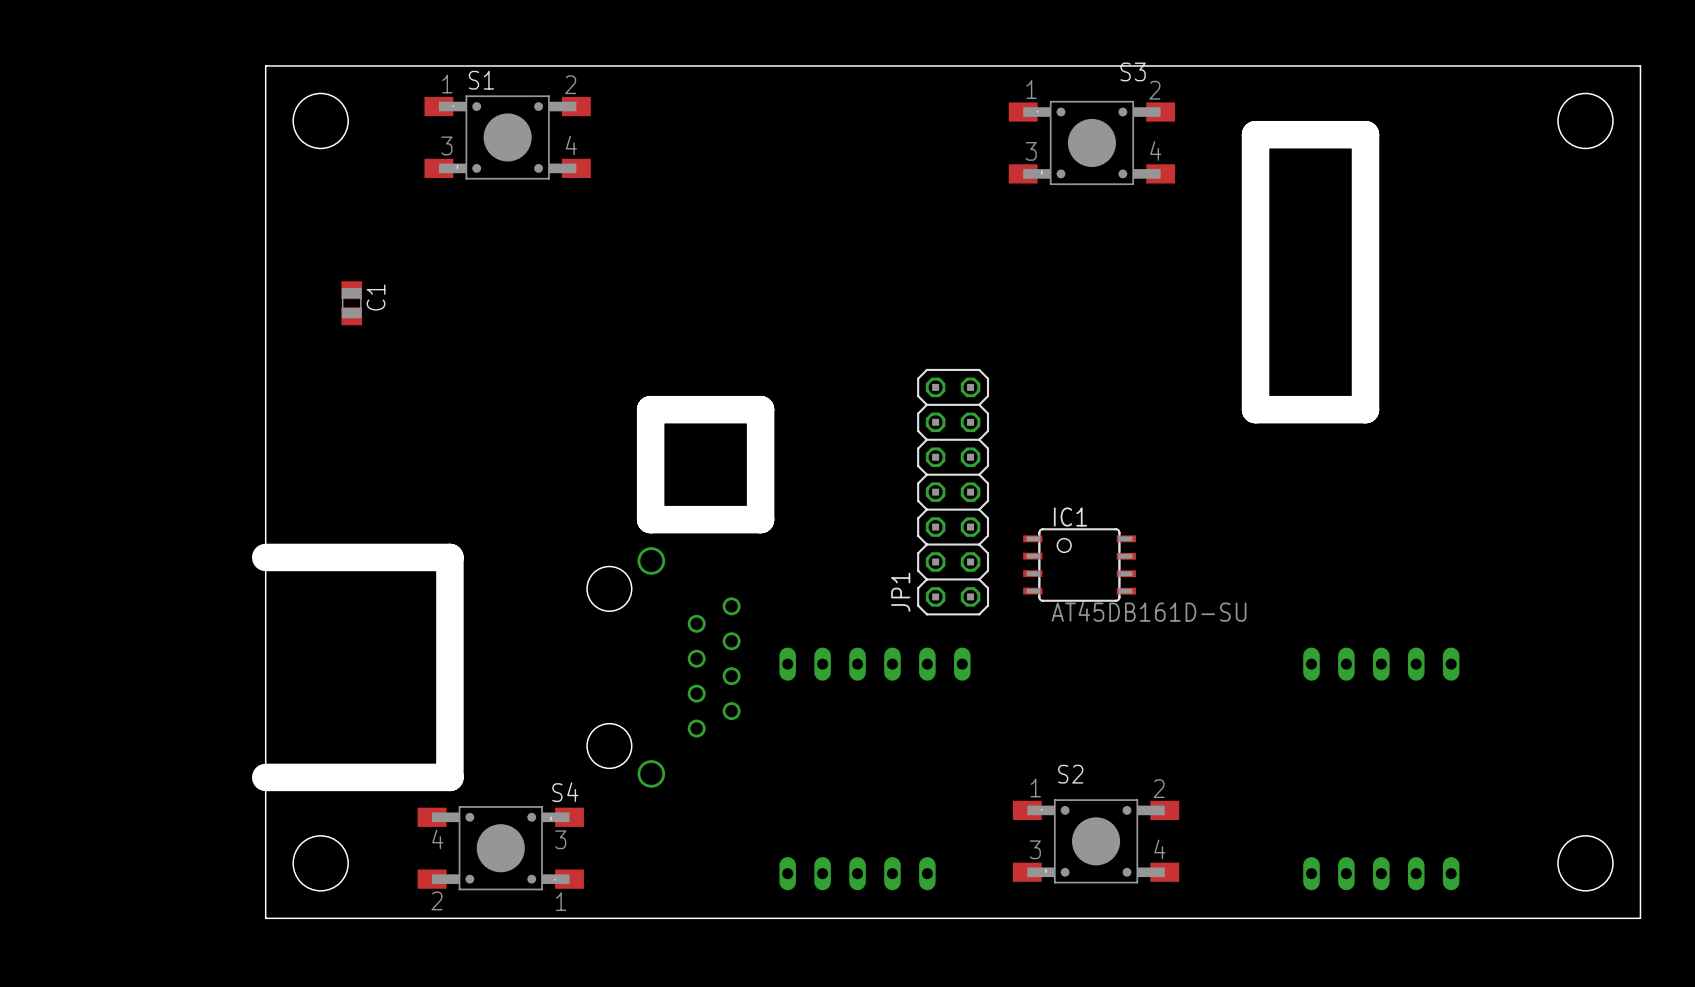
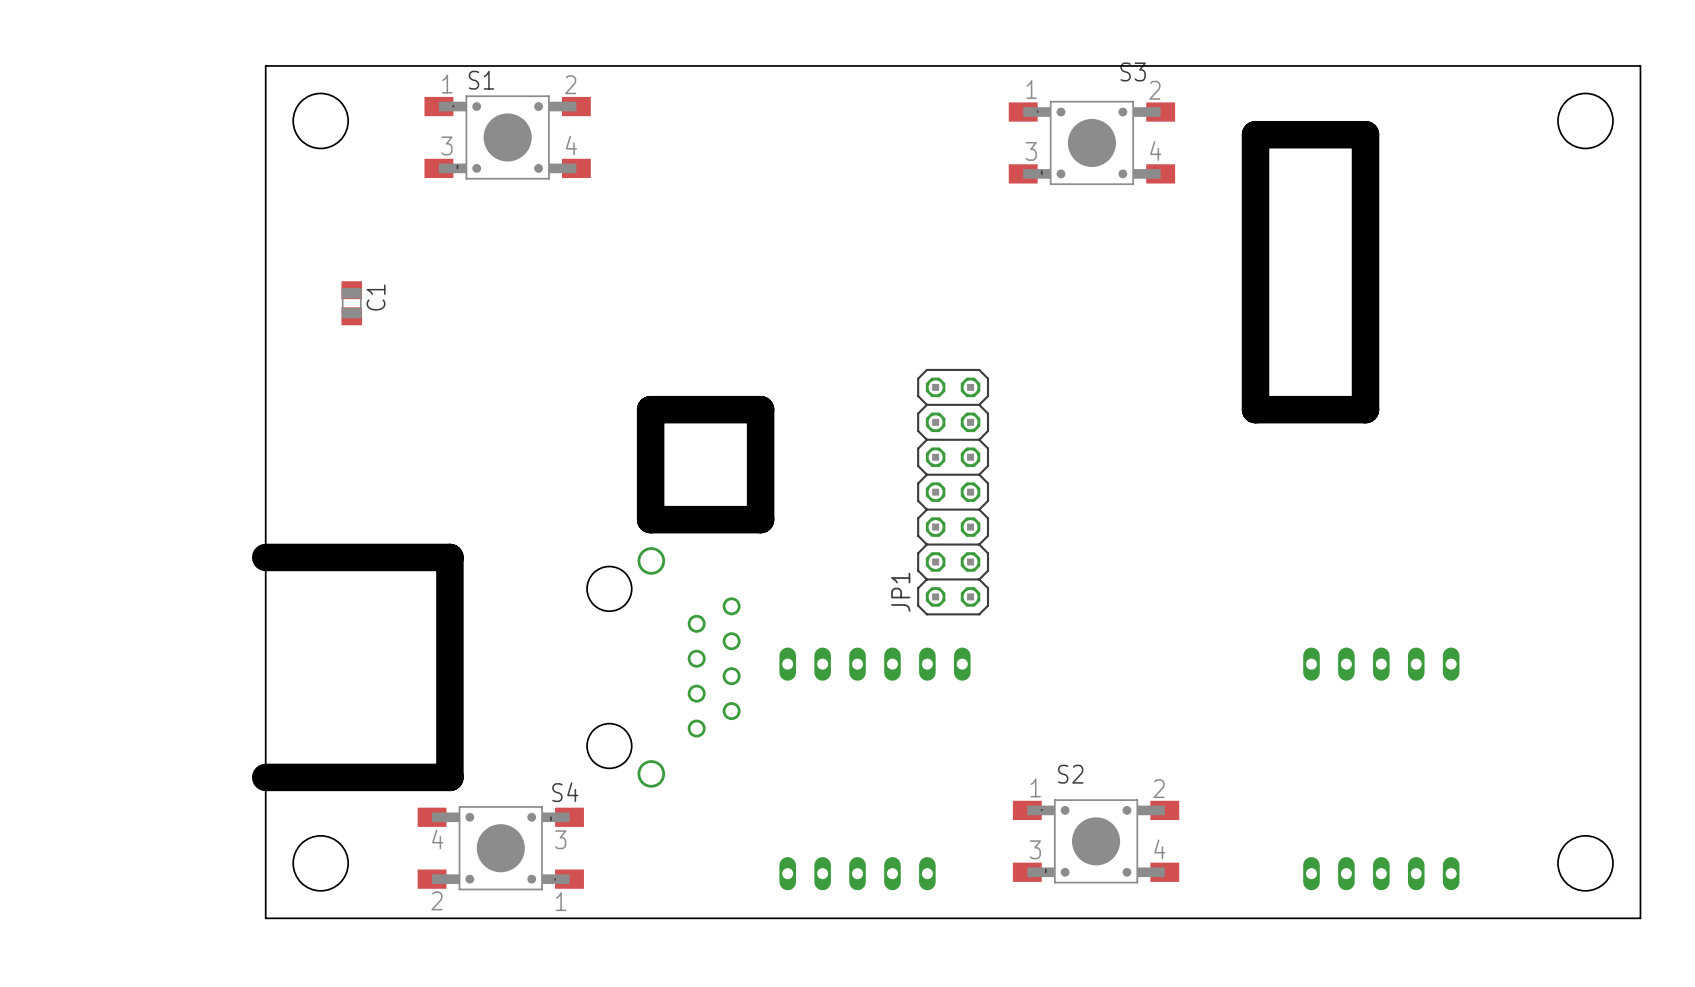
IC1: AT45DB161D-SU (1079, 565) -> none

